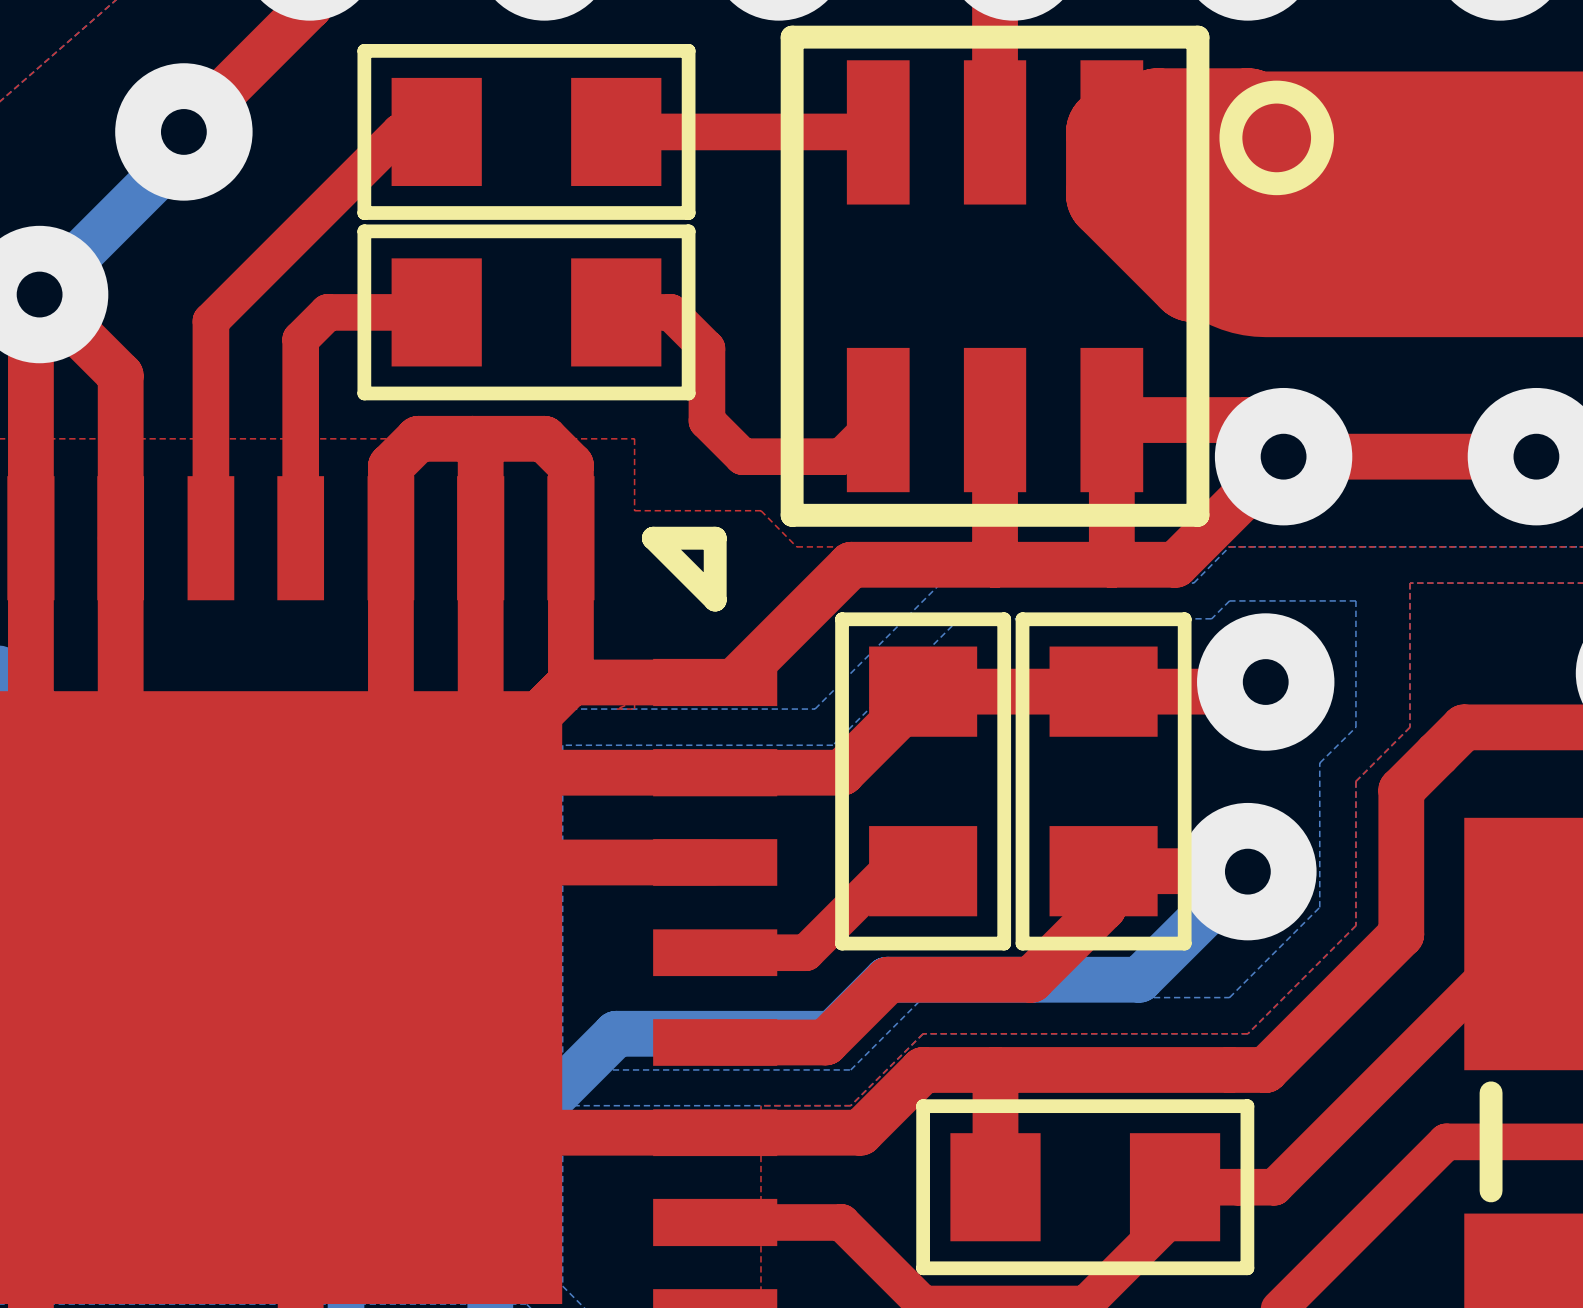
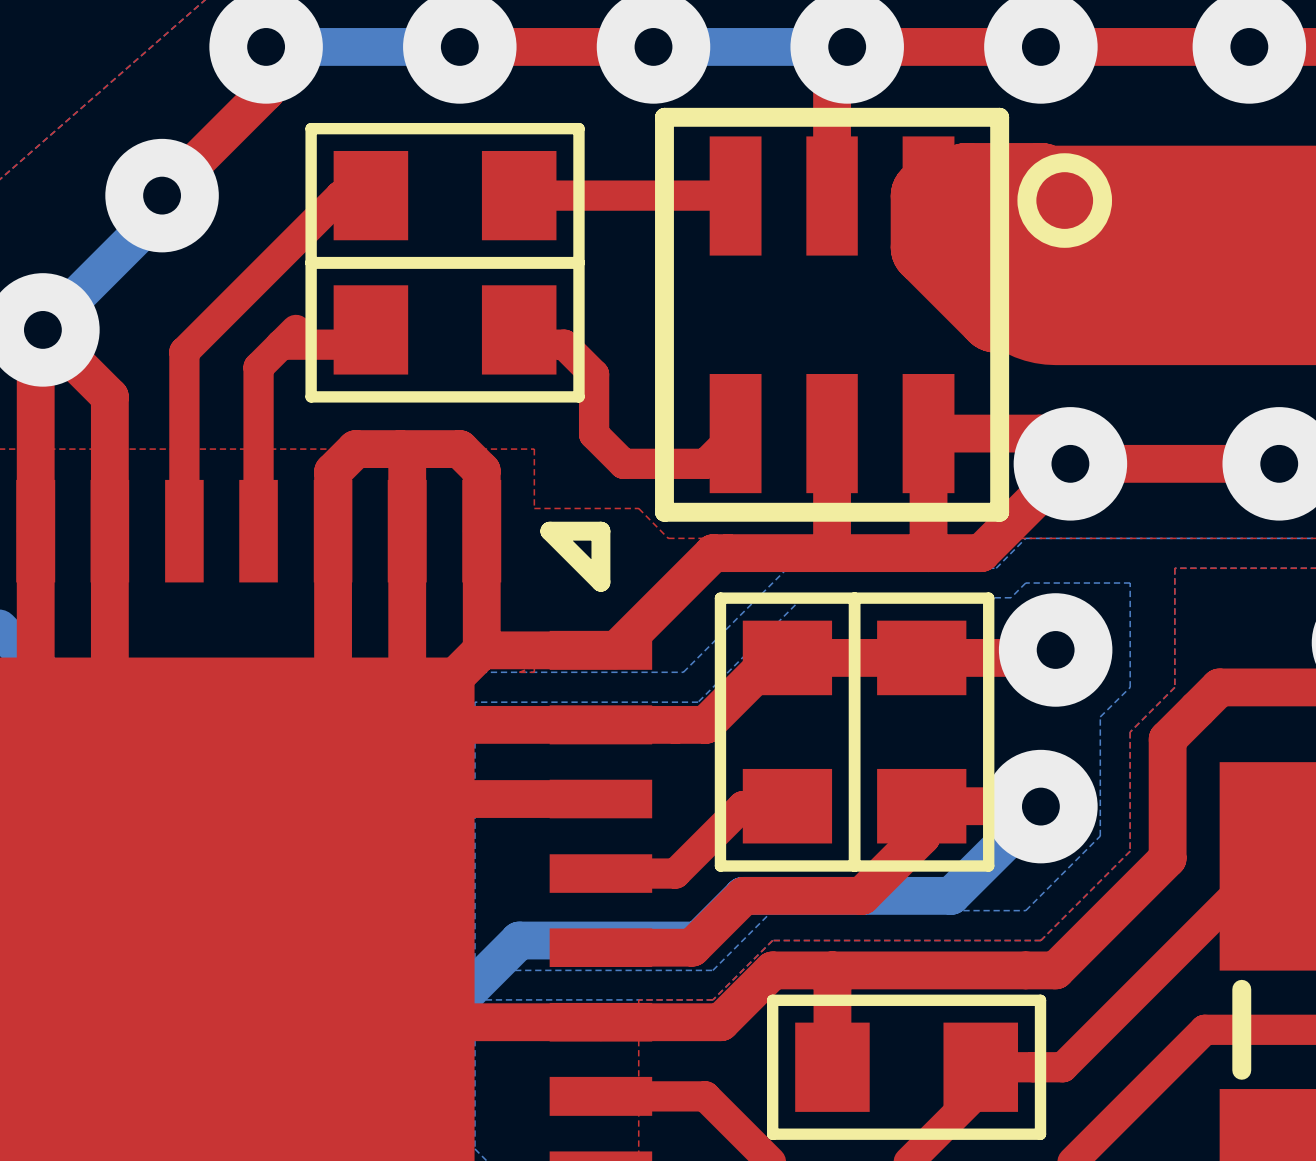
part position: (526, 312) -> (445, 329)
part position: (923, 781) -> (787, 732)

